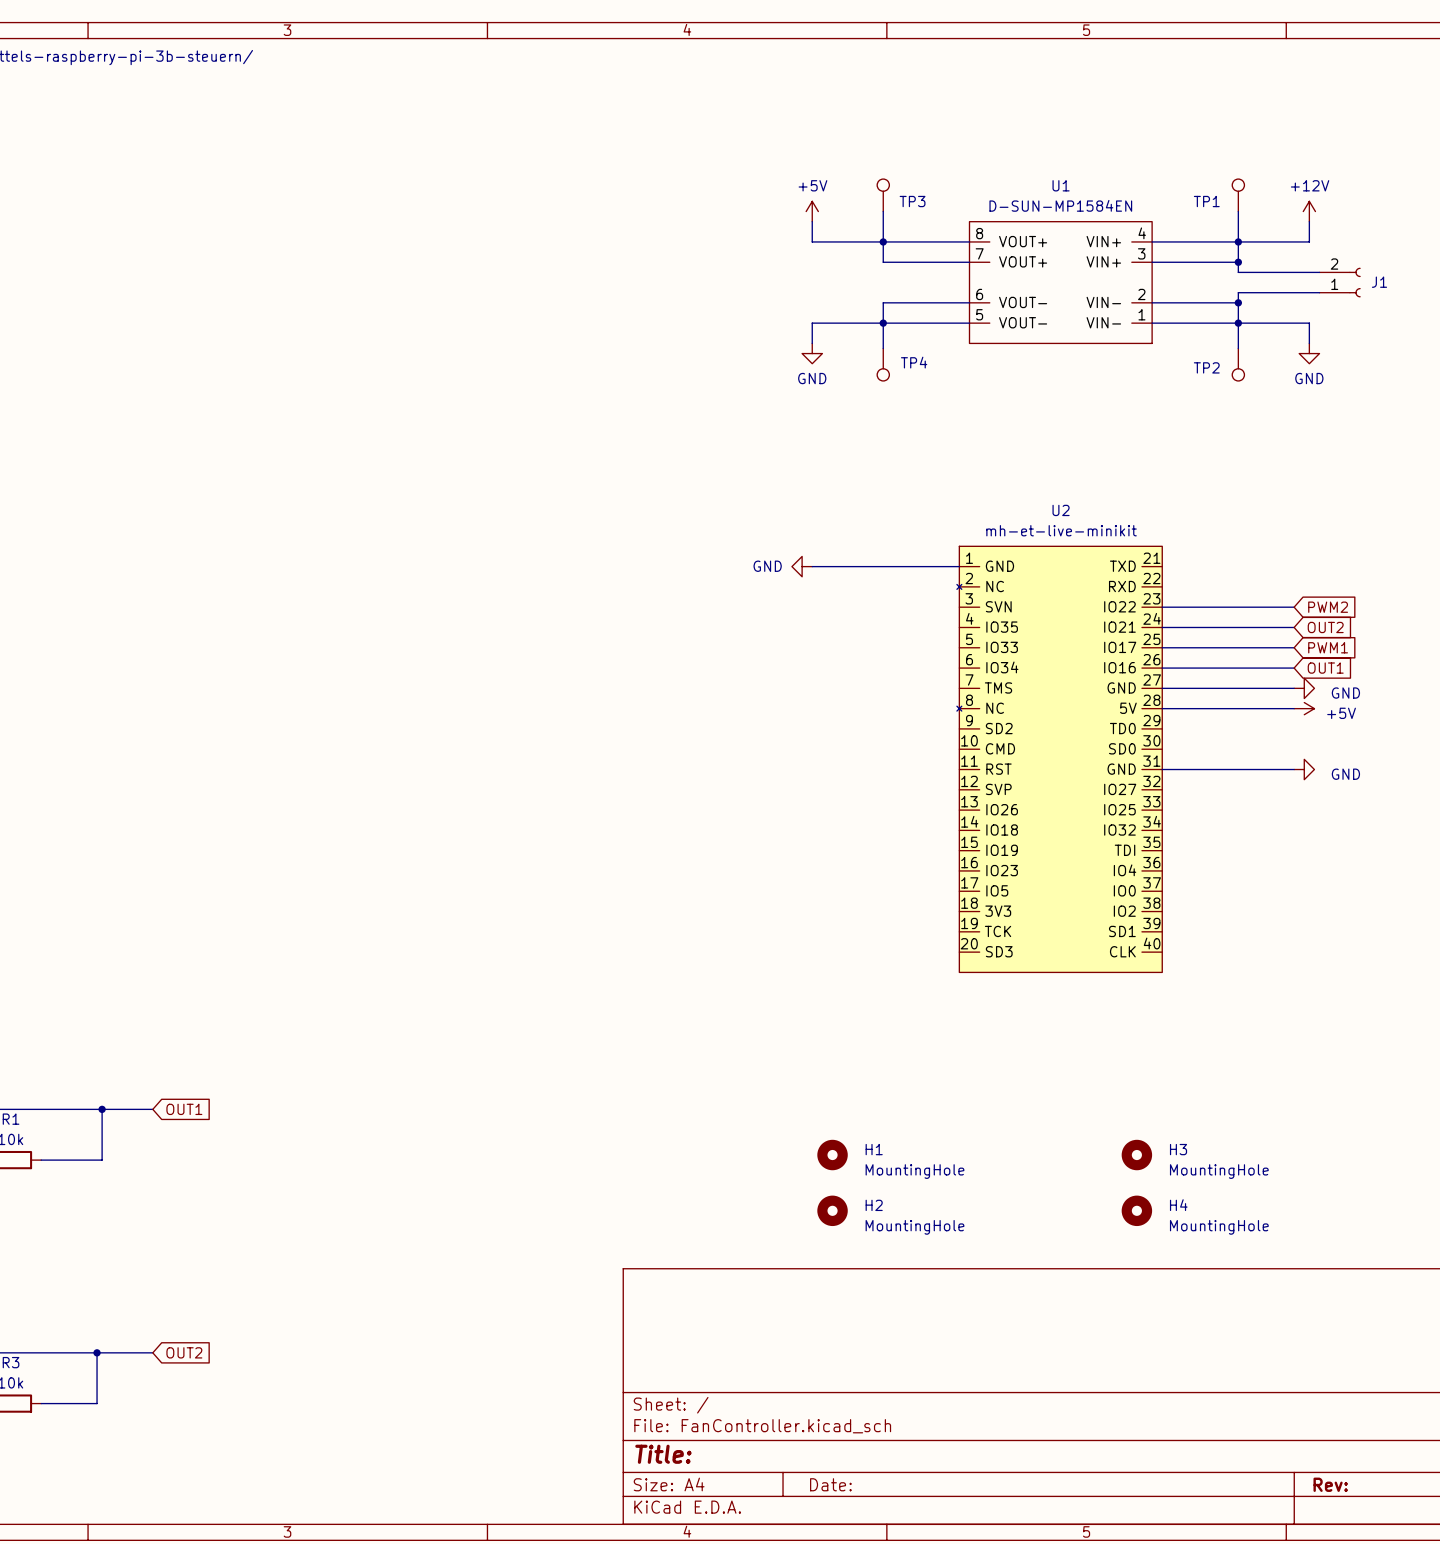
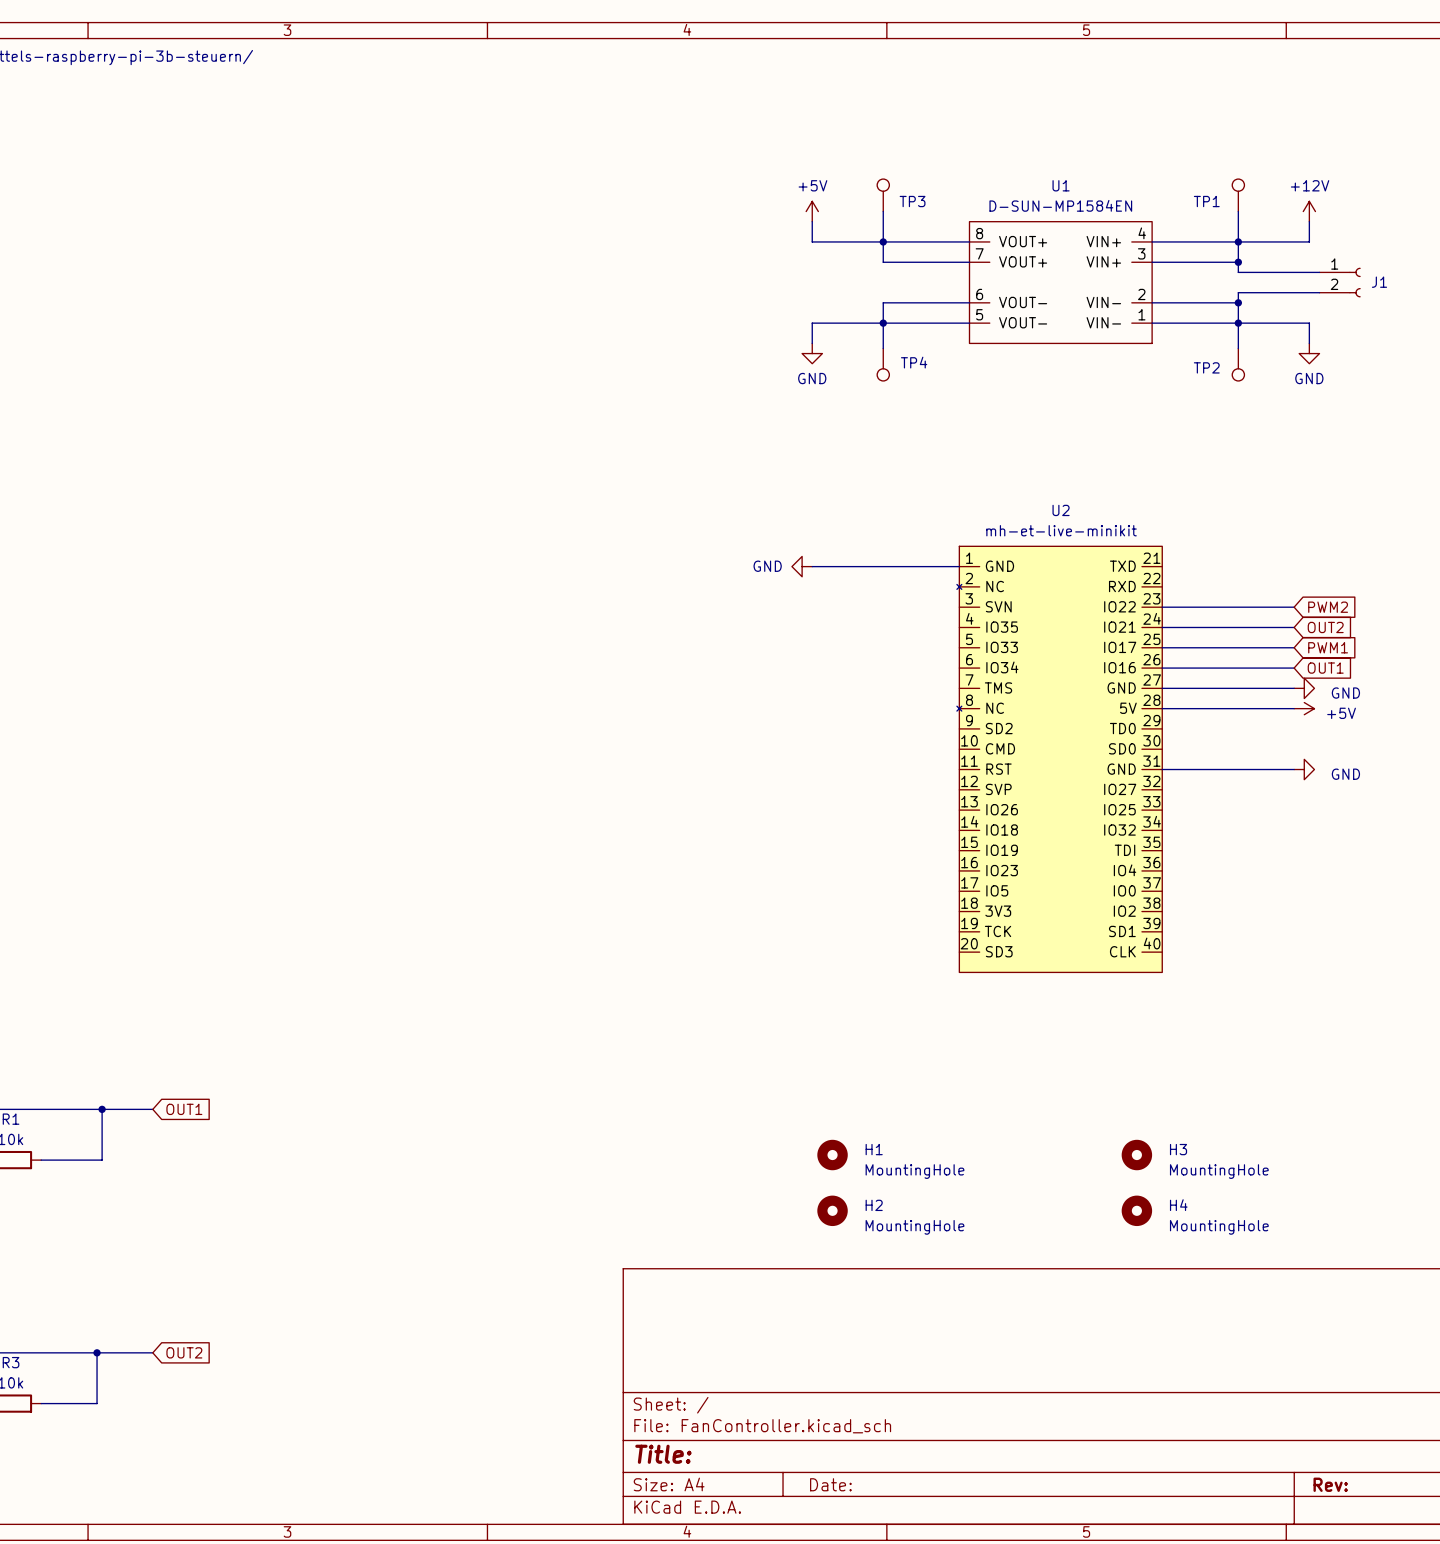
J1 flip: as is (1355, 282) -> up-down (1355, 282)

